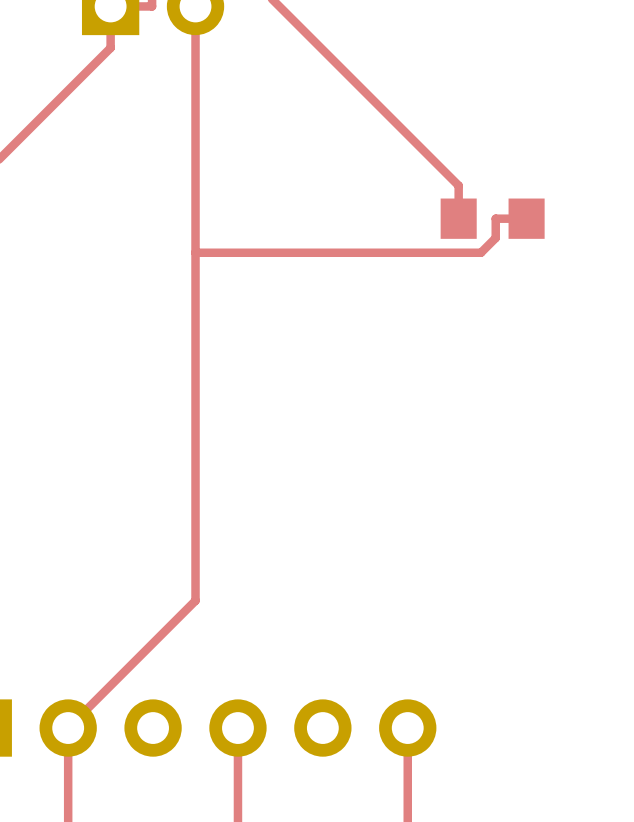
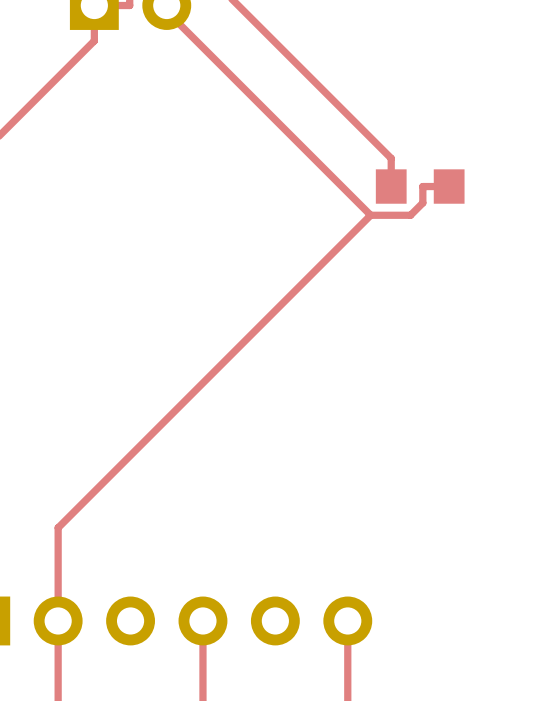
track: (195, 13) (195, 600) (68, 728) -> (370, 215) (58, 527) (58, 620)
track: none -> (166, 11) (370, 215)
track: (195, 252) (480, 252) -> (370, 215) (410, 215)

